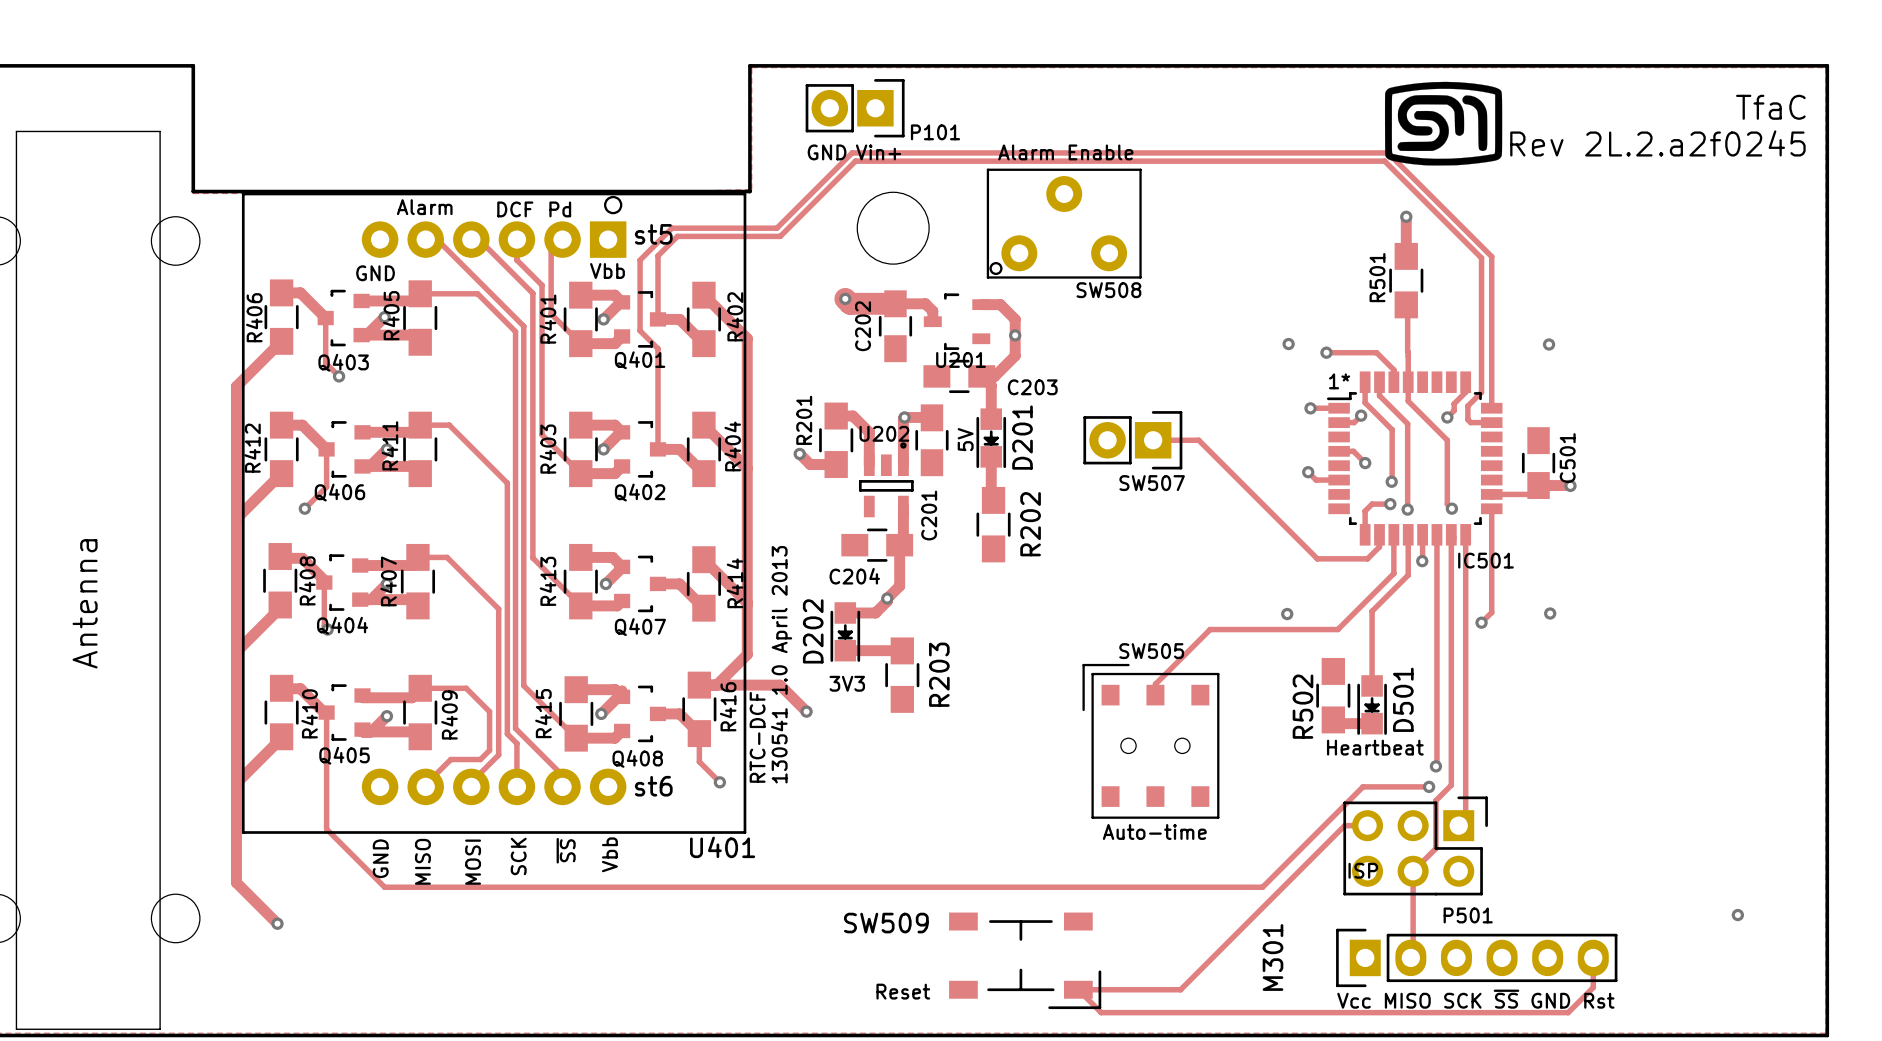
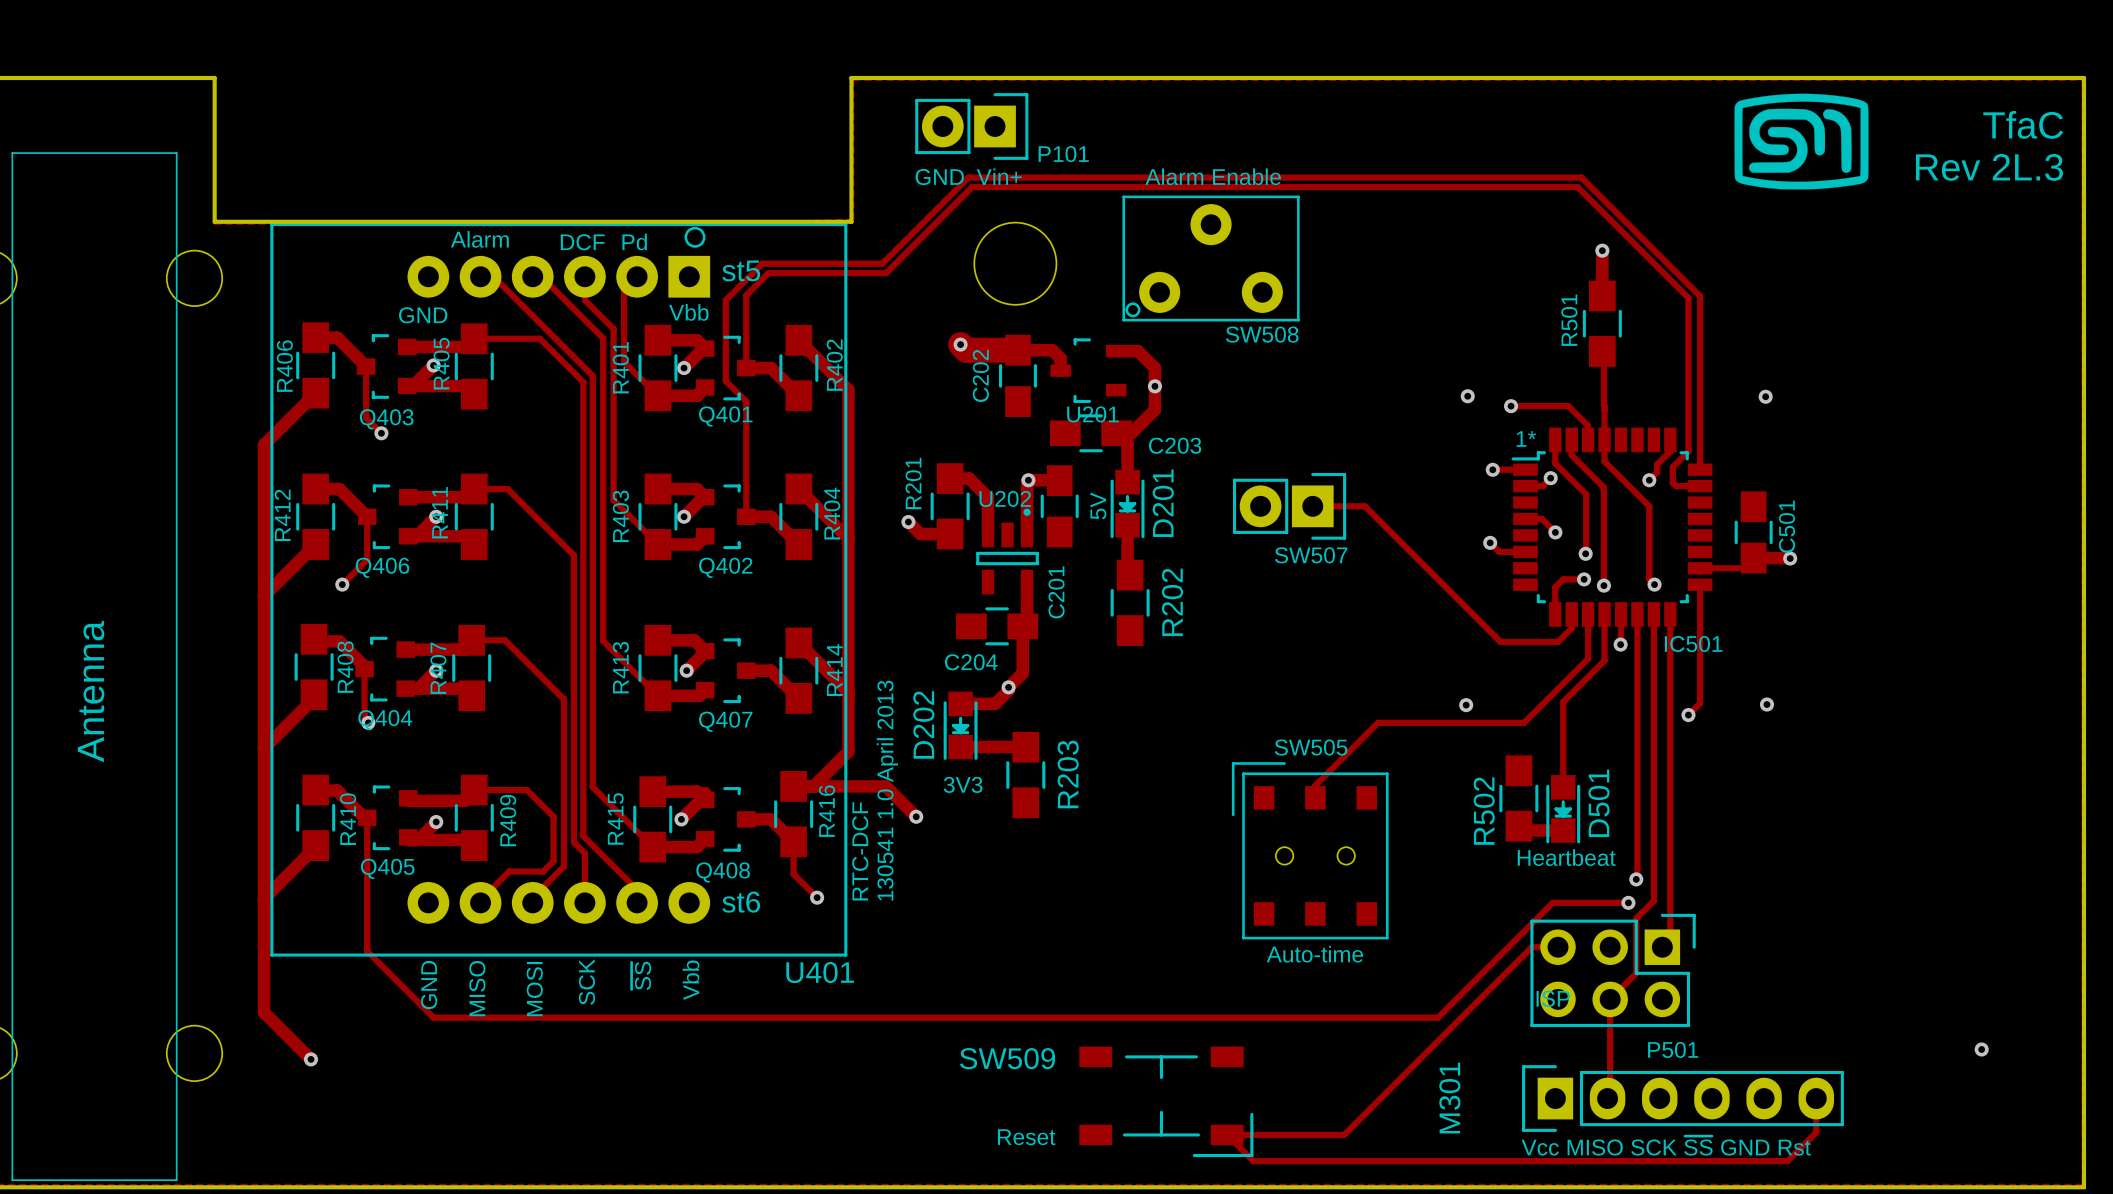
drawing position: (1443, 123) -> (1801, 141)
text: Rev 2L.2.a2f0245 (1657, 143) -> Rev 2L.3 (1989, 167)

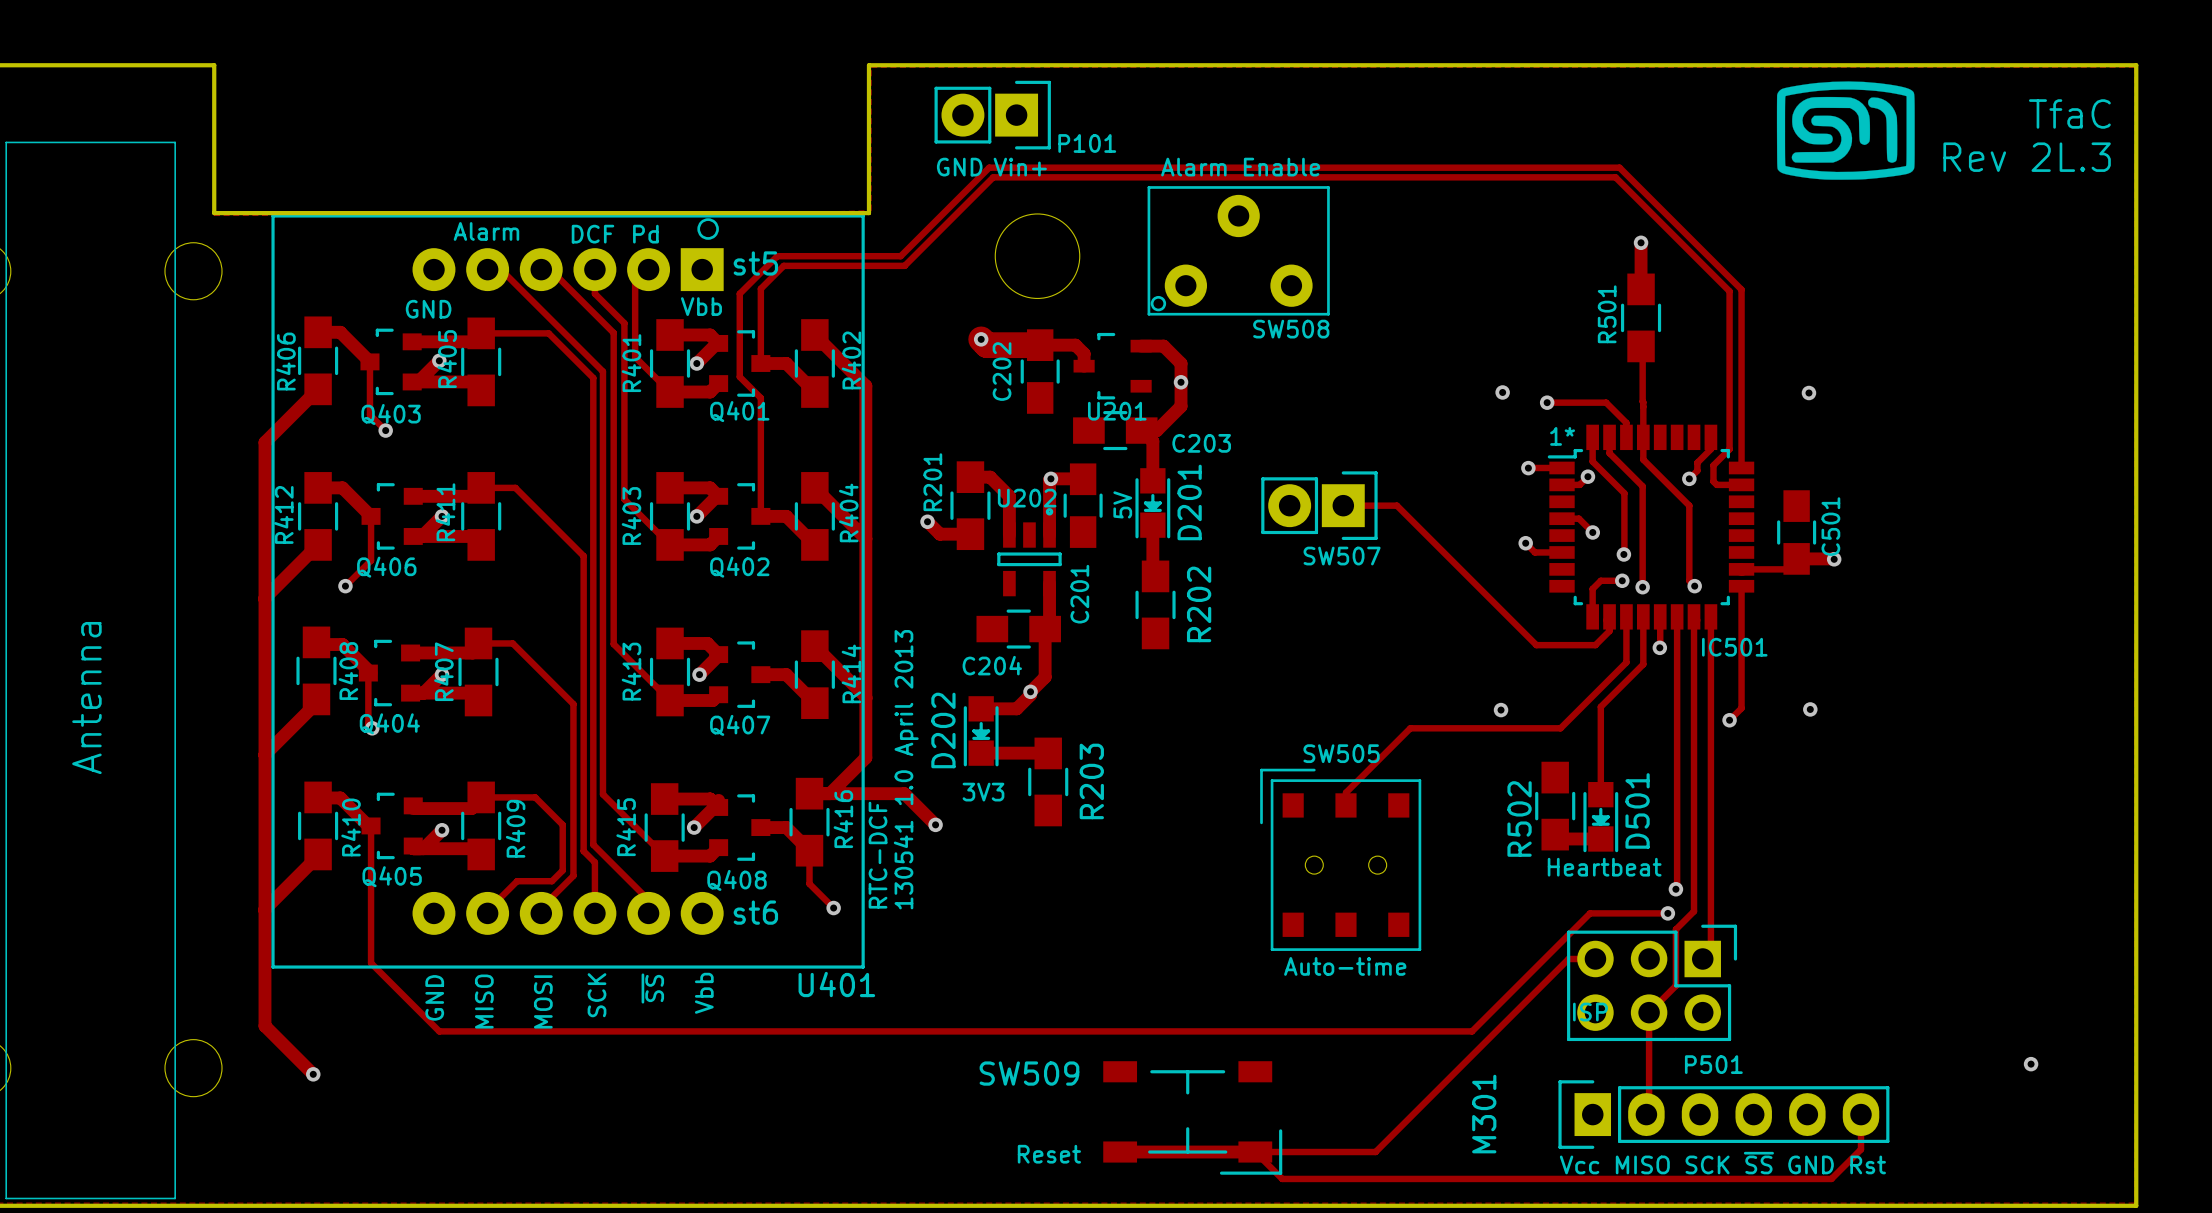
track: none -> (1120, 1152) (1255, 1152)

